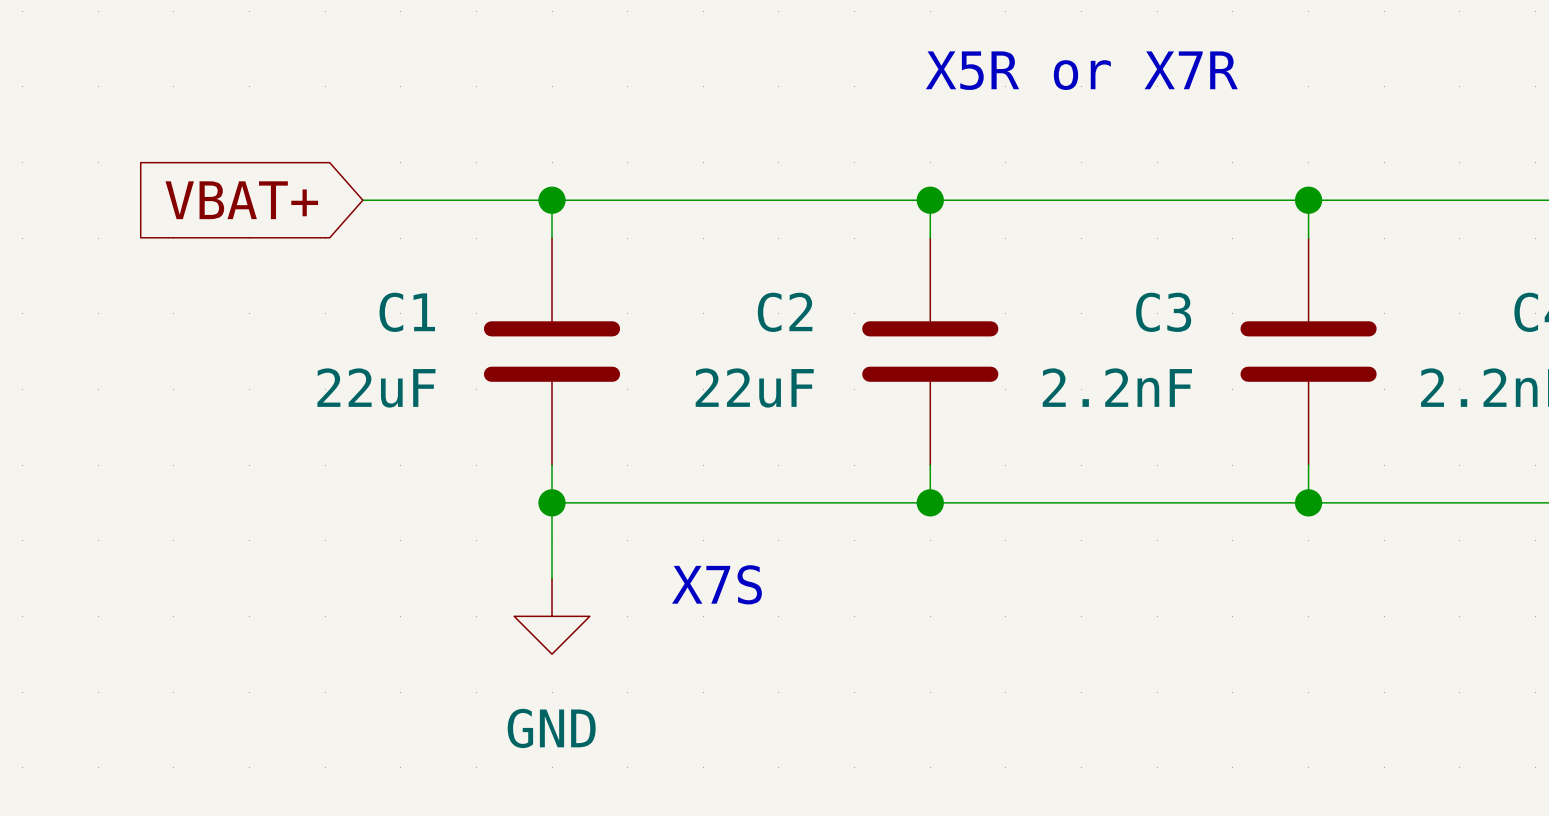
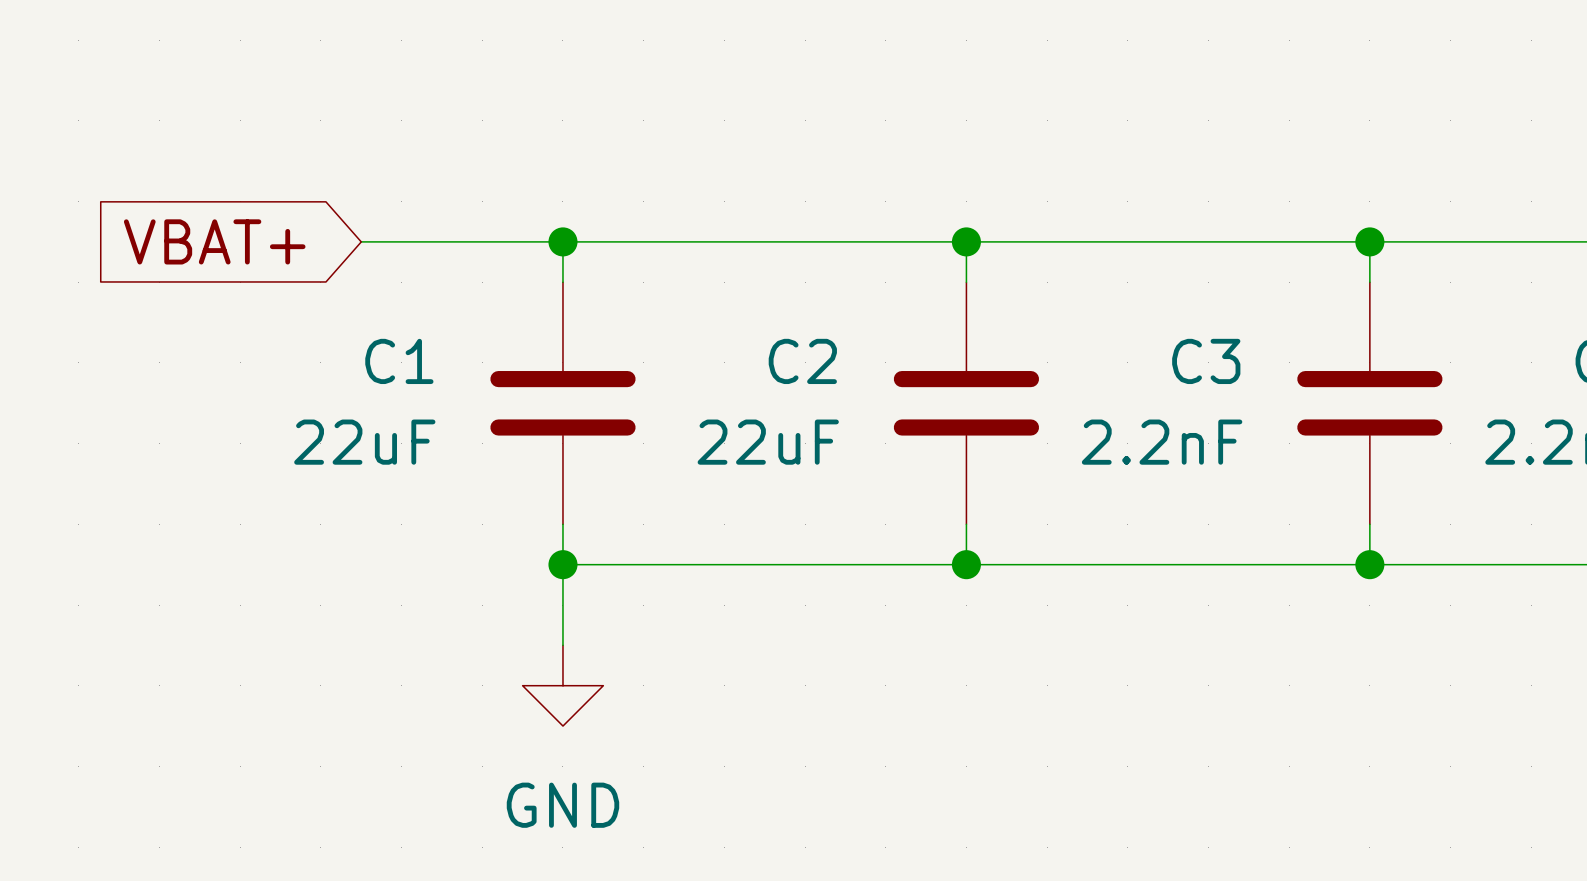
text: X5R or X7R (1081, 70) -> none
text: X7S (716, 584) -> none

